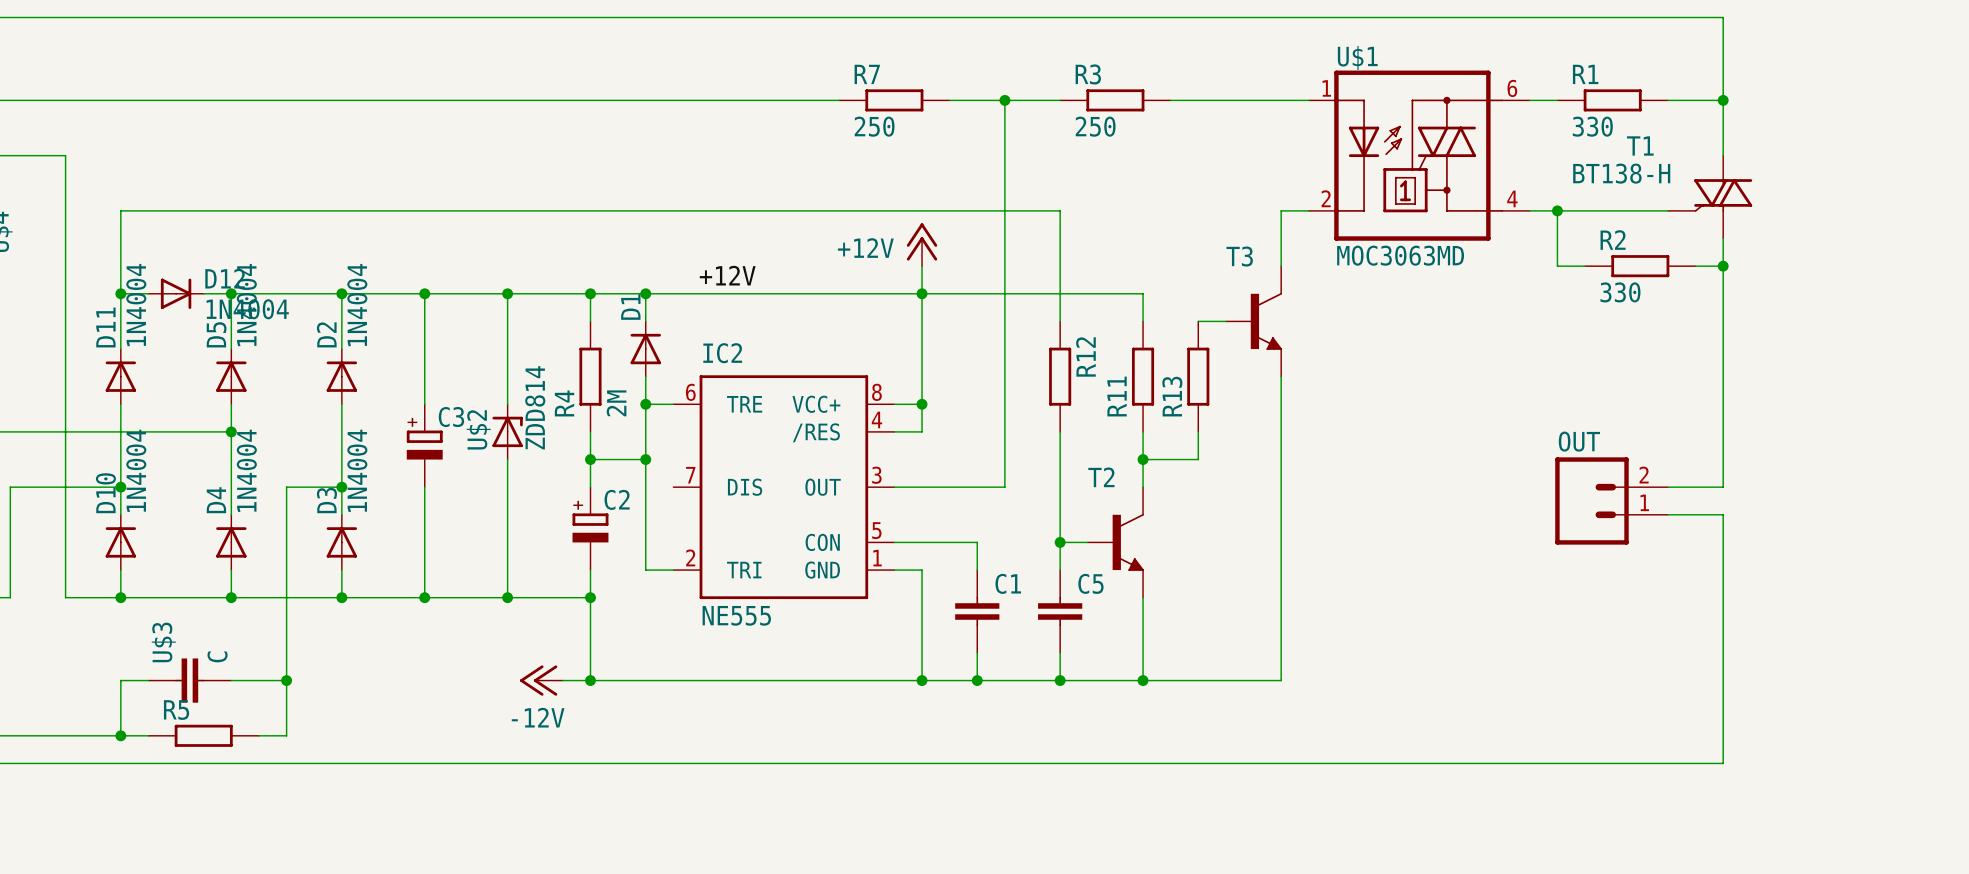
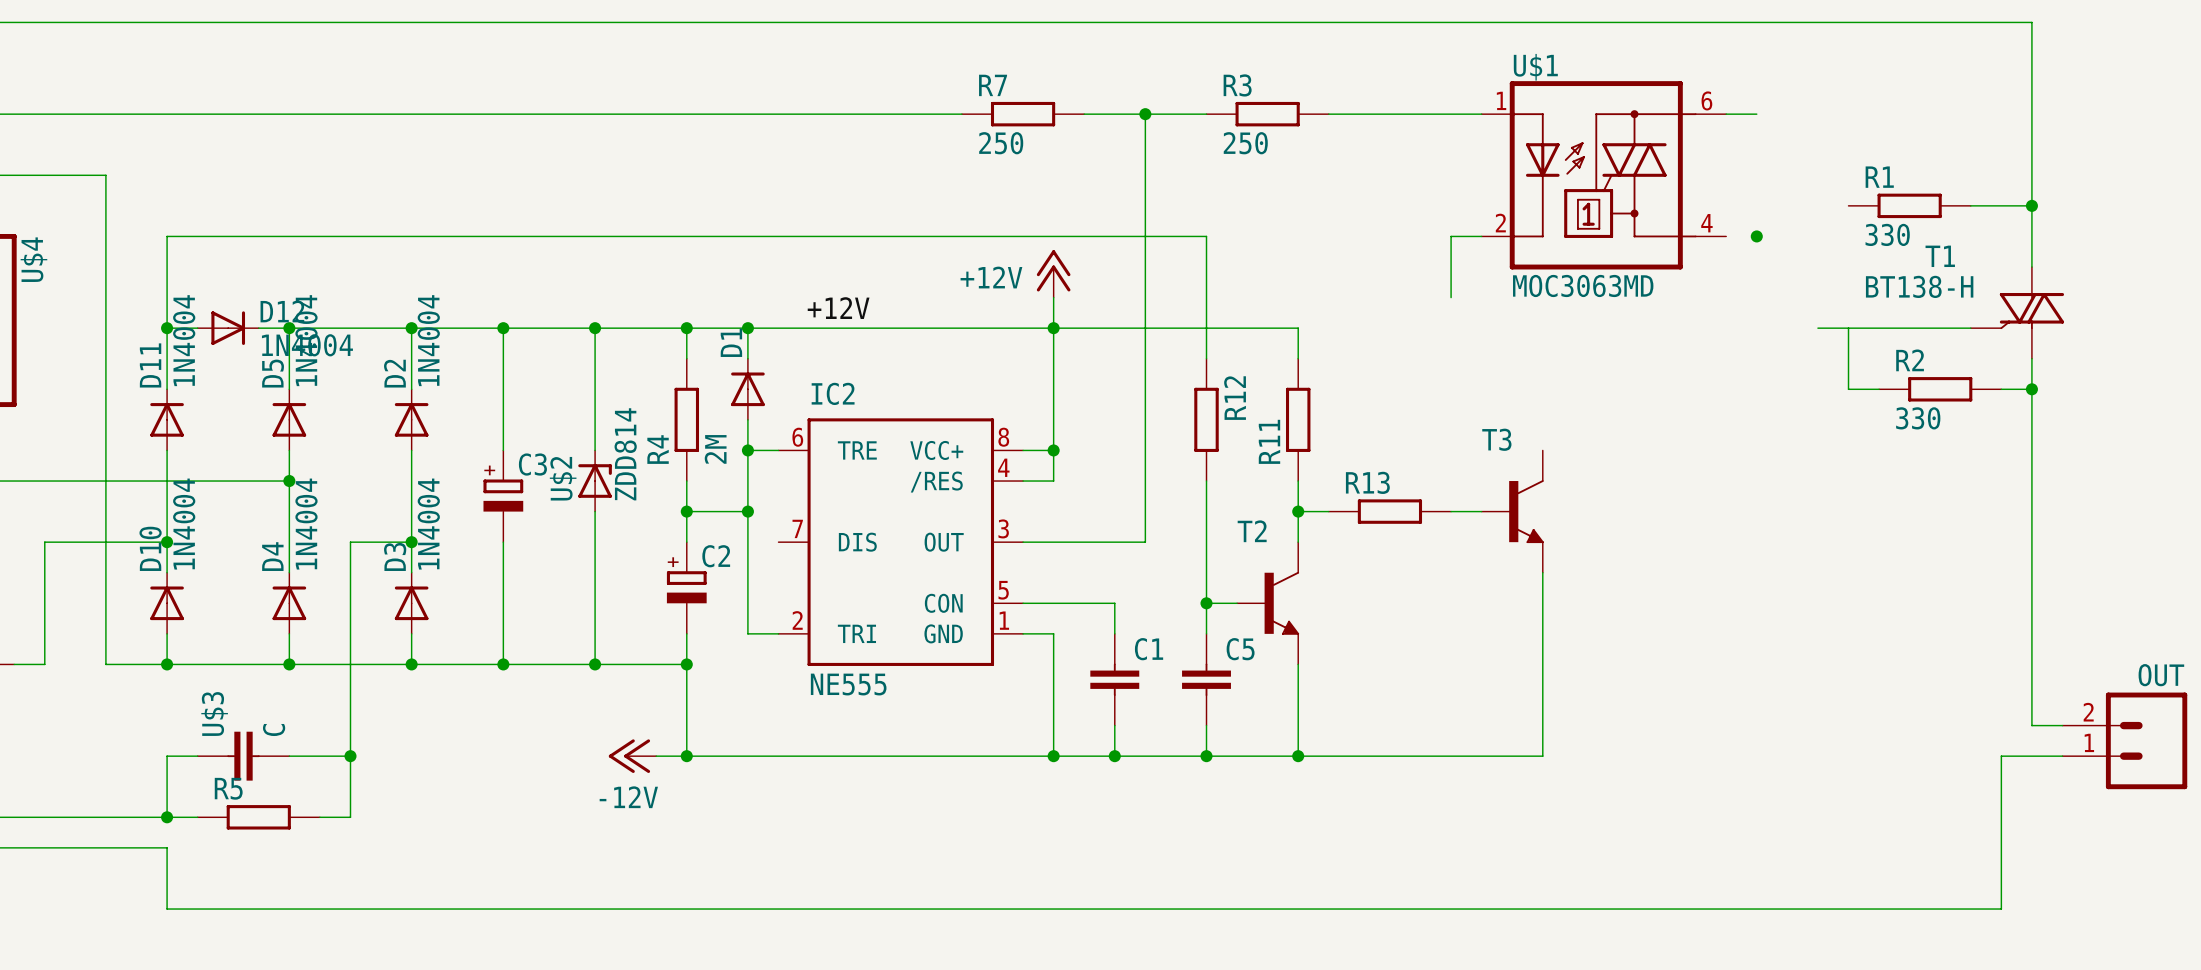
wire: (1723, 17) (1723, 155) -> (1940, 22) (2031, 22) (2031, 267)
R1 position: (1612, 100) -> (1909, 205)
wire: (1667, 100) (1723, 100) -> (1970, 205) (2031, 205)
junction: (1723, 100) -> none
junction: none -> (2031, 205)
T1 position: (1710, 197) -> (2017, 312)
wire: (1529, 210) (1667, 210) -> (1817, 328) (1970, 328)
wire: (1557, 210) (1557, 266) (1585, 266) -> (1848, 328) (1848, 389) (1879, 389)
wire: (1723, 238) (1723, 487) (1667, 487) -> none
R2 position: (1640, 266) -> (1940, 389)
wire: (1695, 266) (1723, 266) -> (2001, 389) (2031, 389)
junction: (1723, 266) -> none
wire: (1198, 321) (1225, 321) -> (1451, 511) (1481, 511)
T3 position: (1253, 321) -> (1512, 511)
wire: none -> (2031, 358) (2031, 725) (2062, 725)
junction: none -> (2031, 389)
R13 rotation: 0° (1198, 376) -> 90° clockwise (1389, 511)
R13 position: (1198, 376) -> (1389, 511)
wire: (1281, 376) (1281, 680) -> (1542, 572) (1542, 756) (1451, 756)
OUT: (1611, 500) -> none
wire: (1667, 514) (1723, 514) (1723, 763) (120, 763) -> (2062, 756) (2001, 756) (2001, 909) (167, 909) (167, 847)
OUT: none -> (2124, 740)

